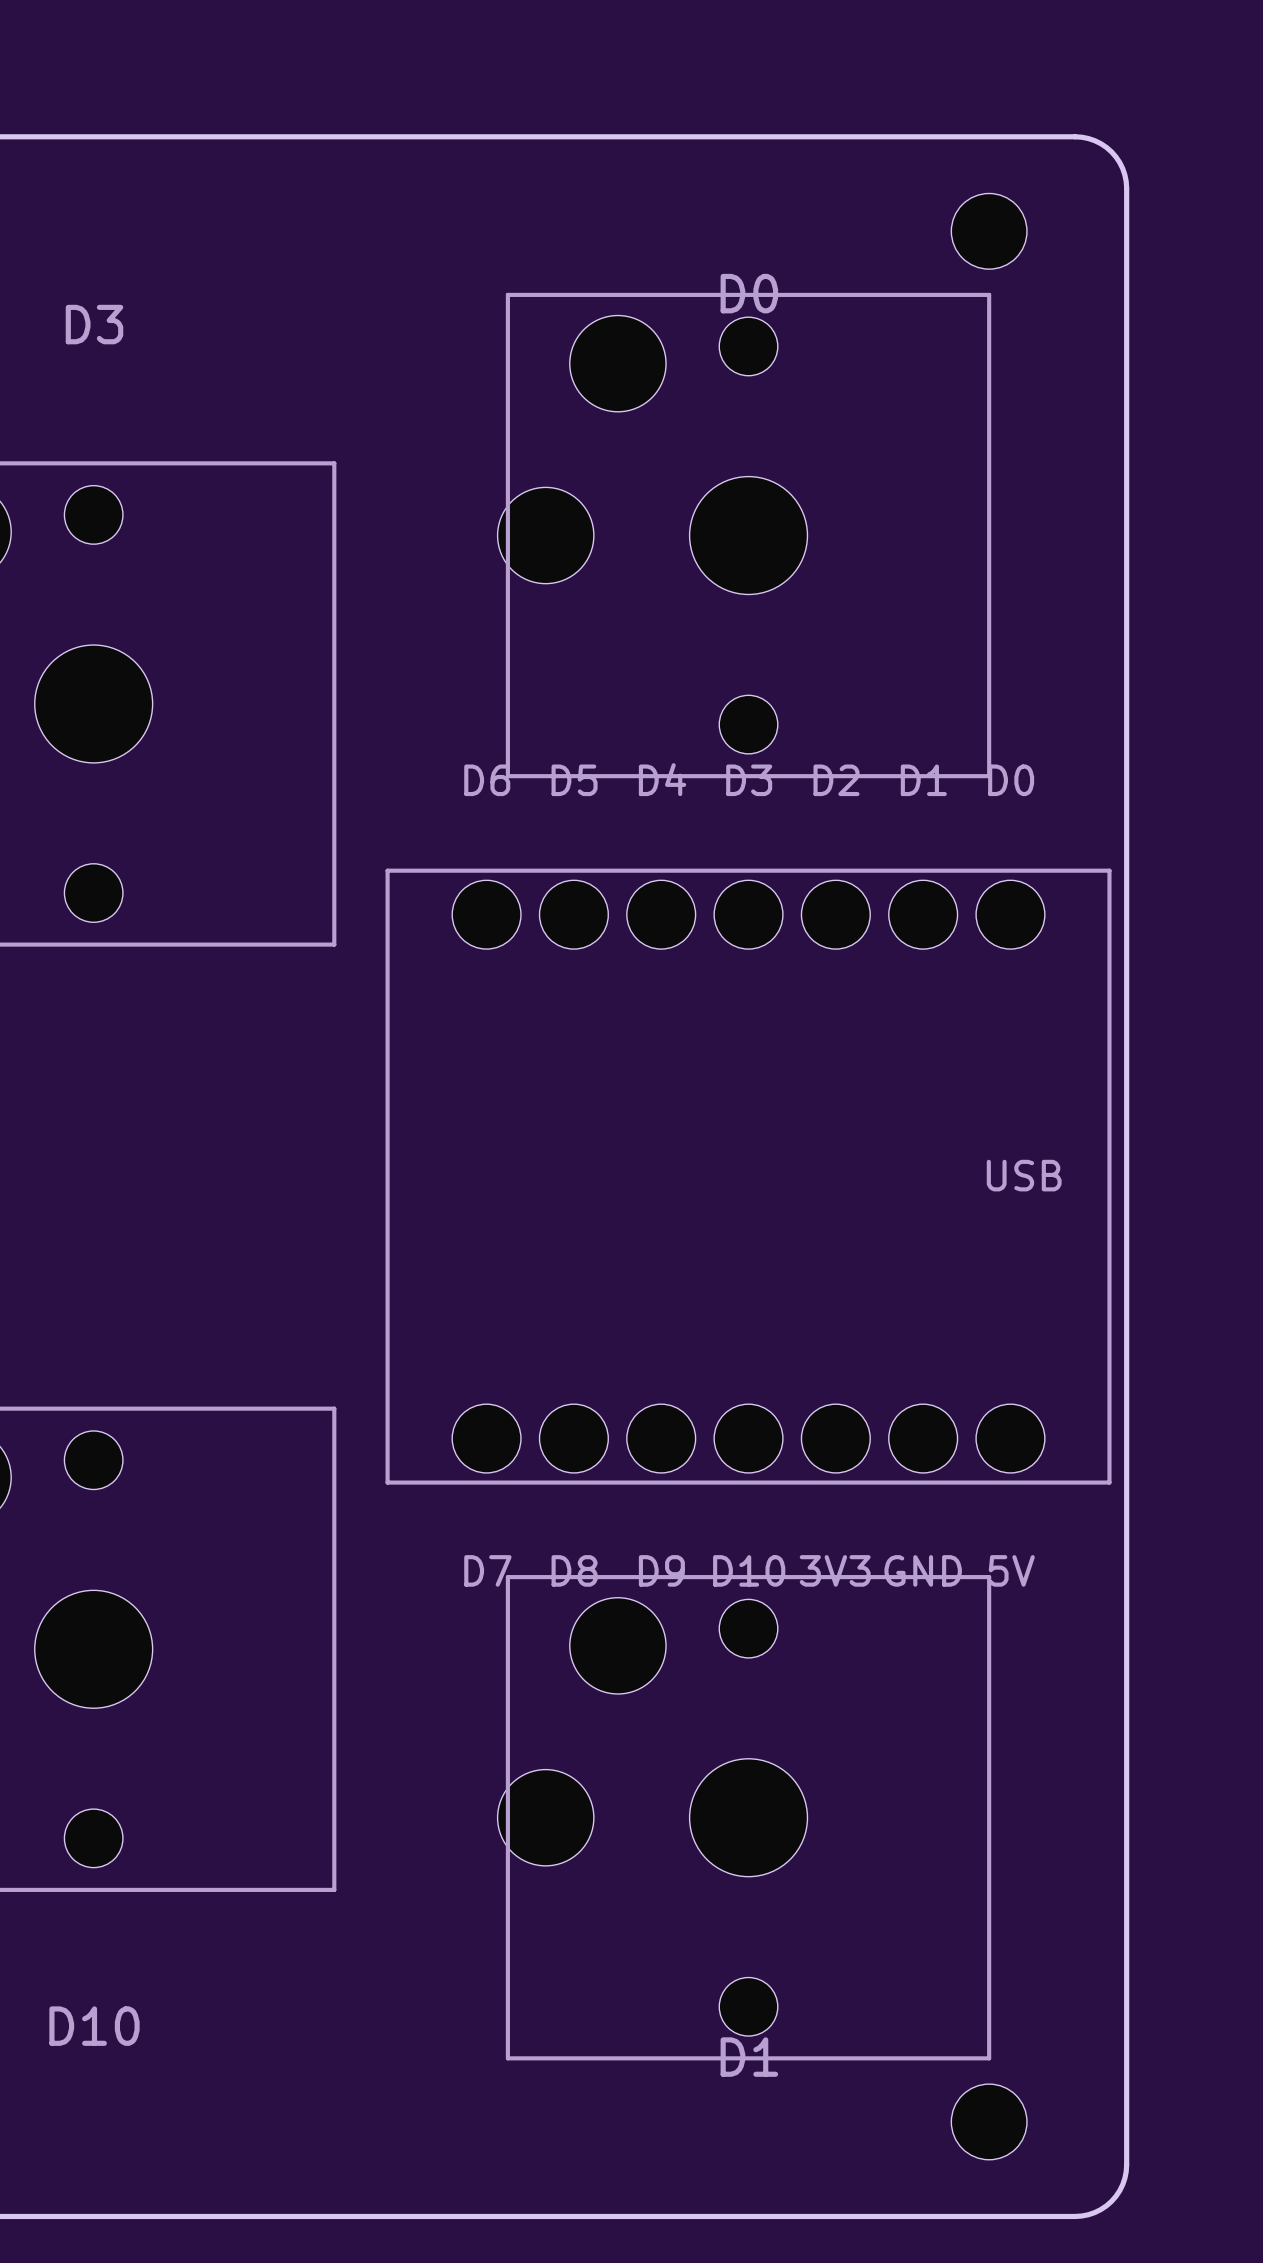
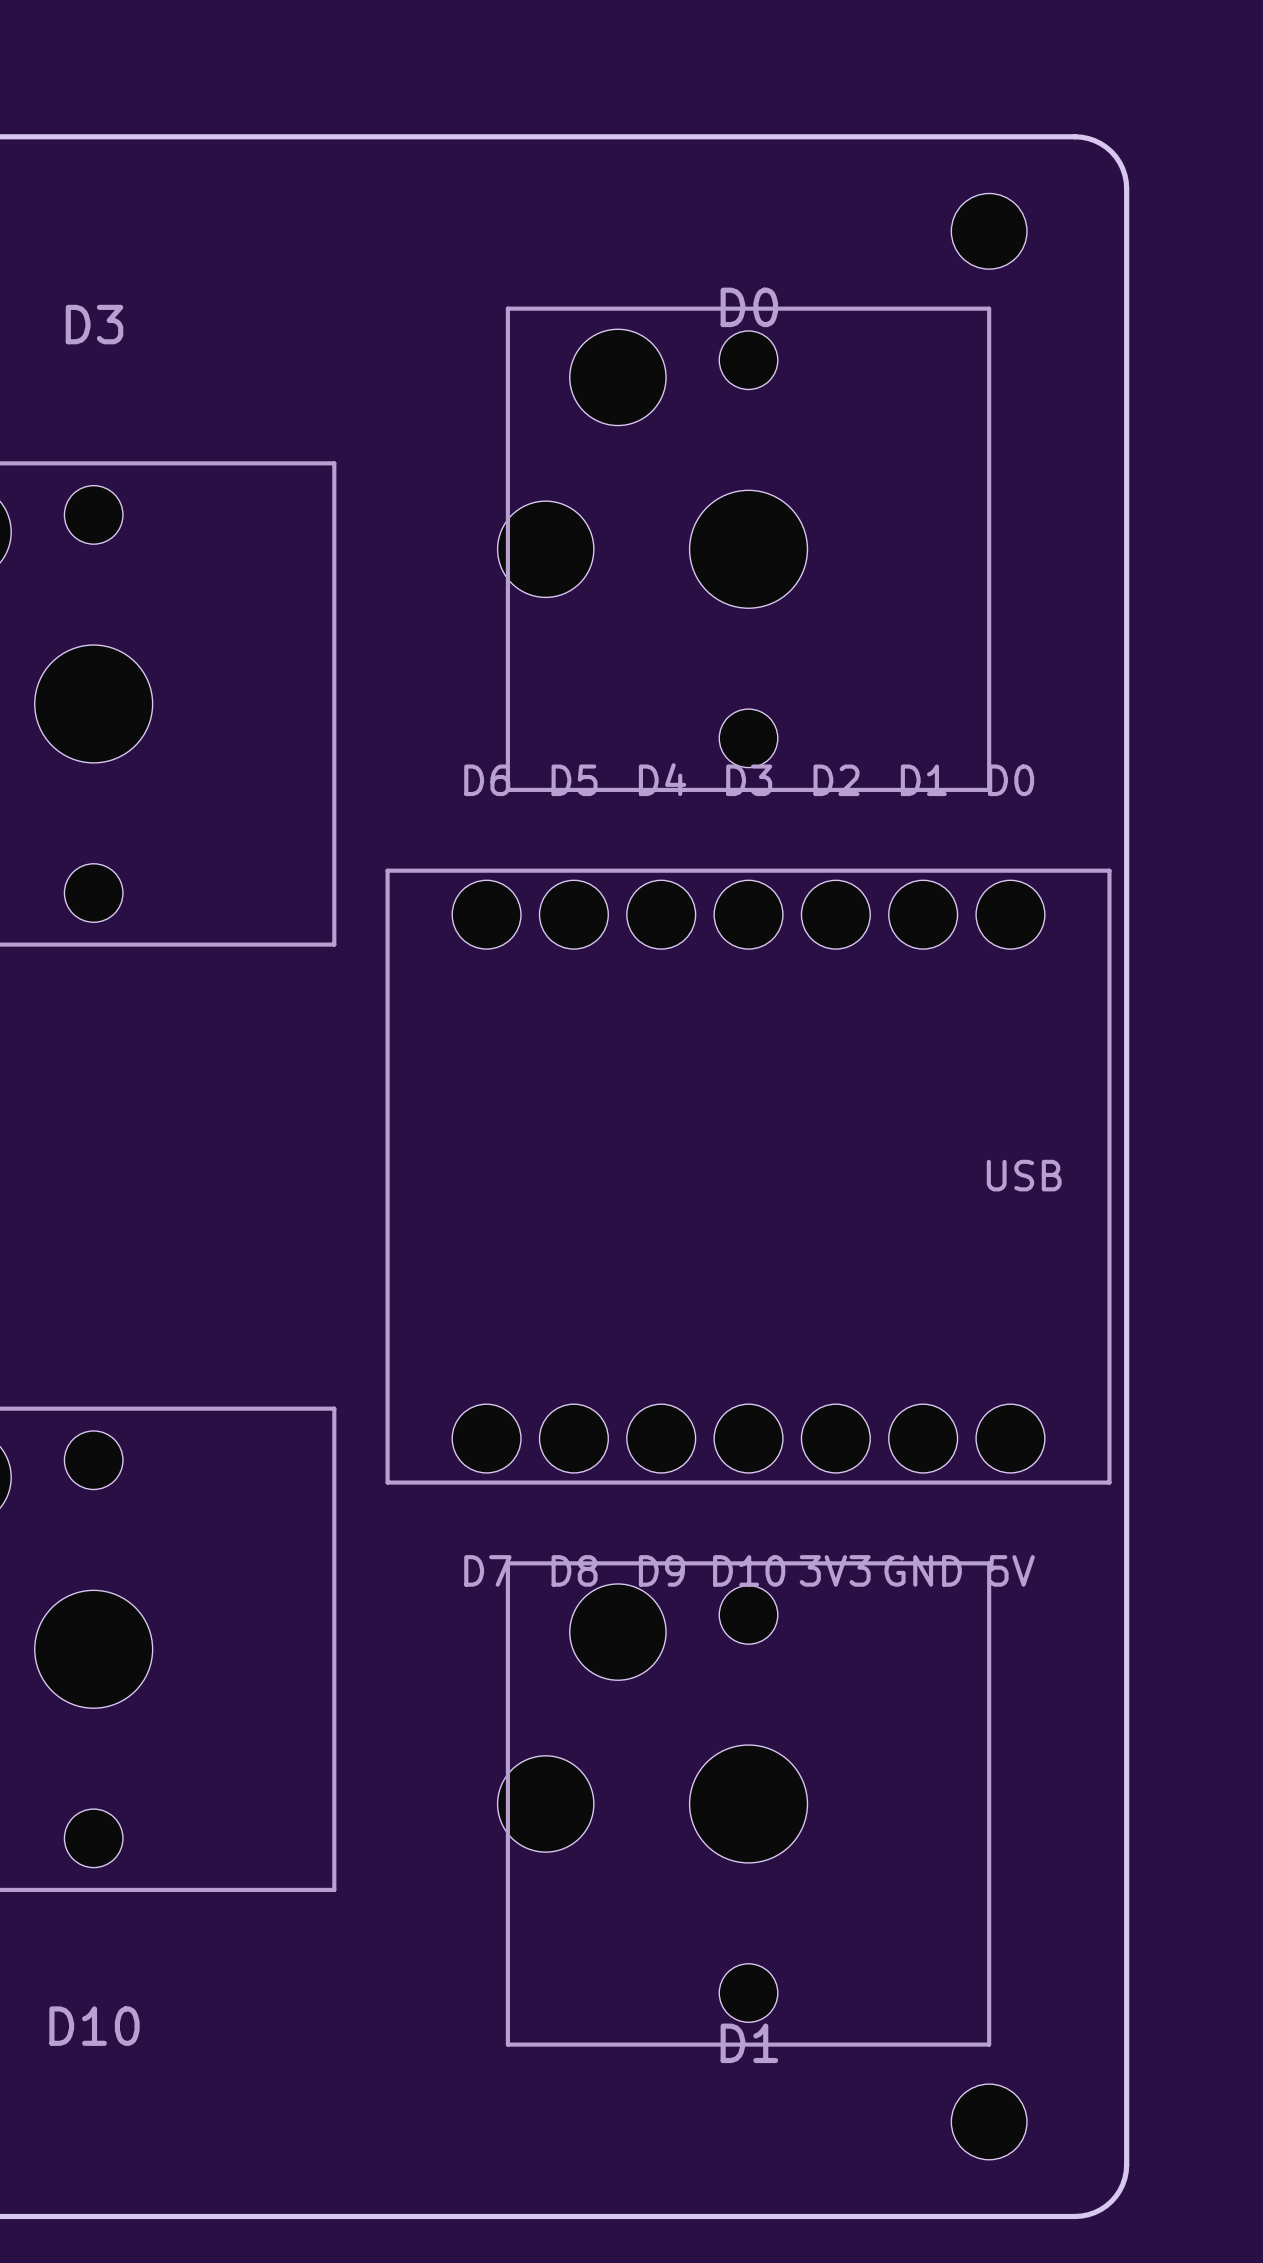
part position: (744, 535) -> (744, 549)
part position: (744, 1817) -> (744, 1803)

